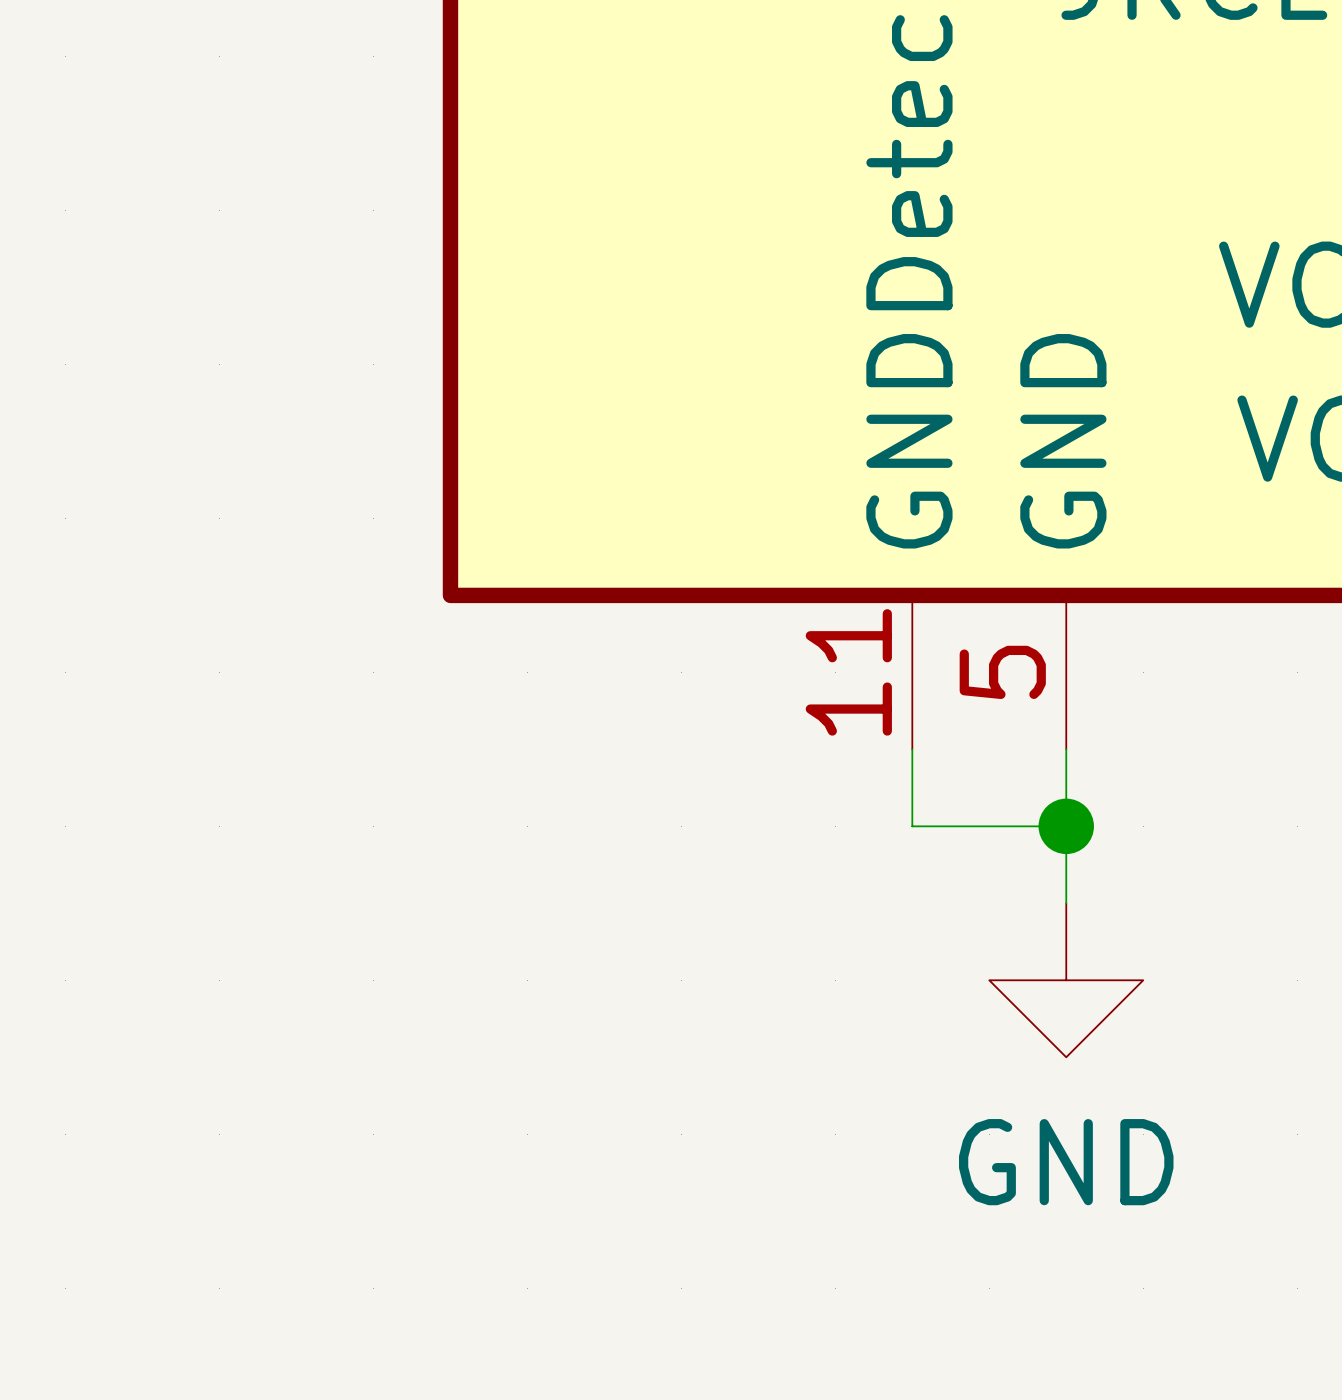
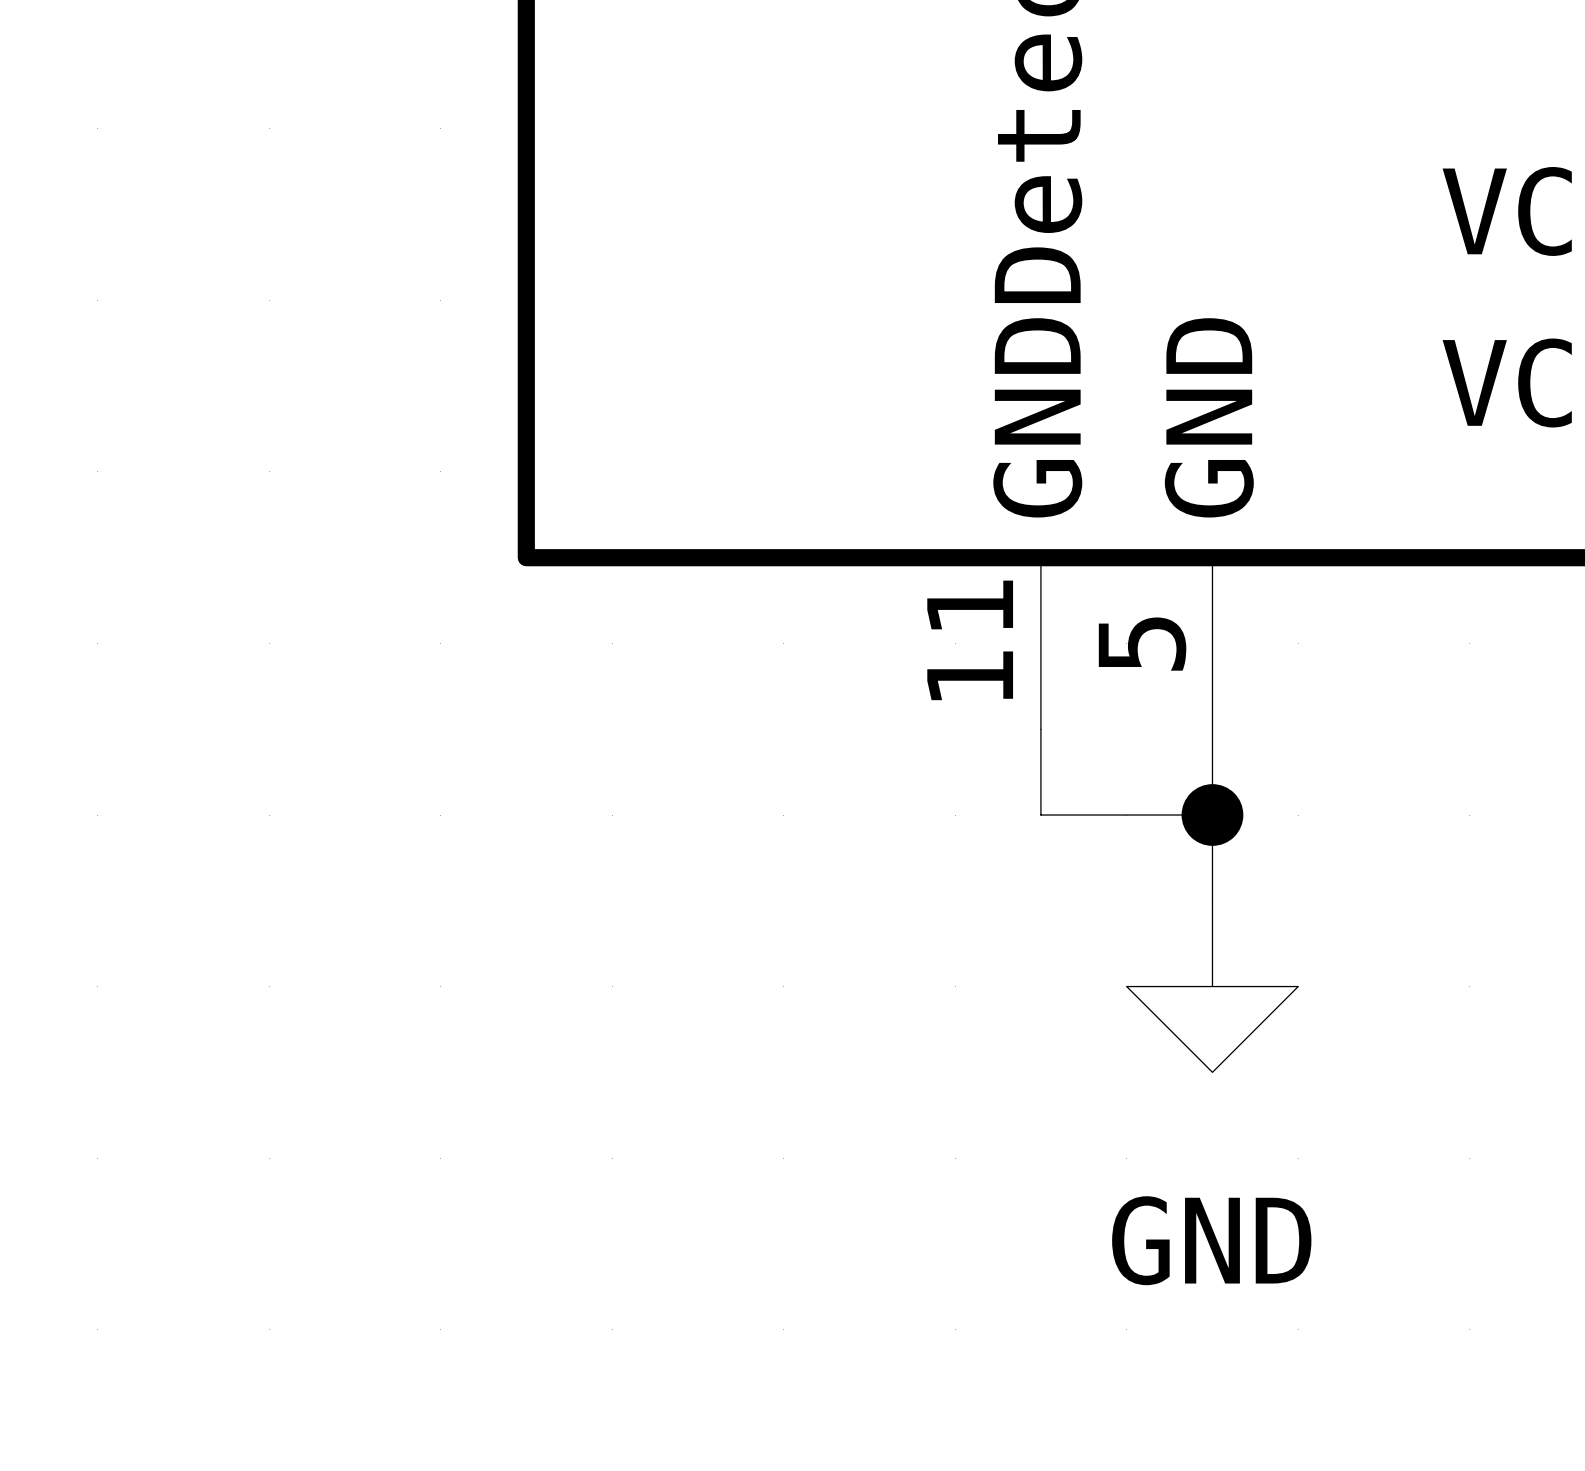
power symbol text position: GND (1066, 1162) -> GND (1211, 1240)

